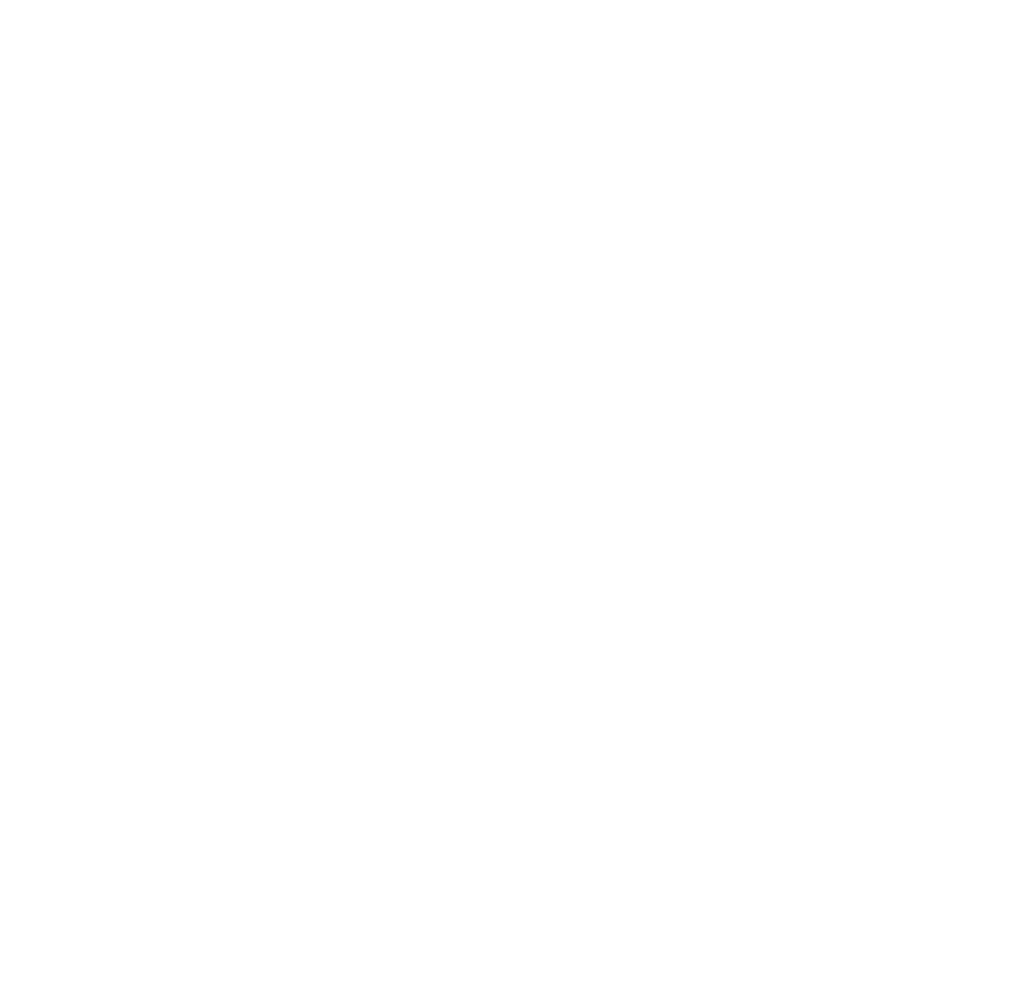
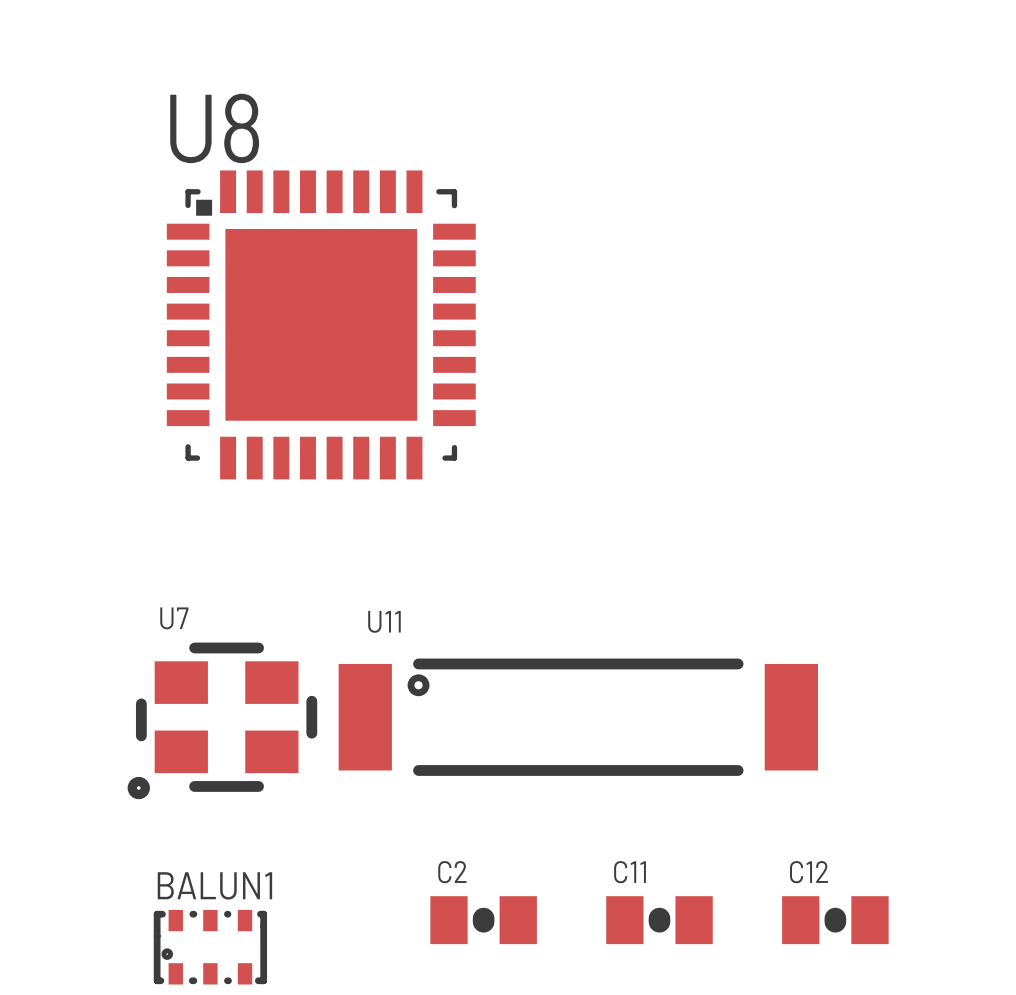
U8: none -> (321, 324)
U11: none -> (578, 717)
U7: none -> (222, 720)
C2: none -> (483, 920)
C11: none -> (659, 920)
C12: none -> (835, 920)
BALUN1: none -> (210, 947)

